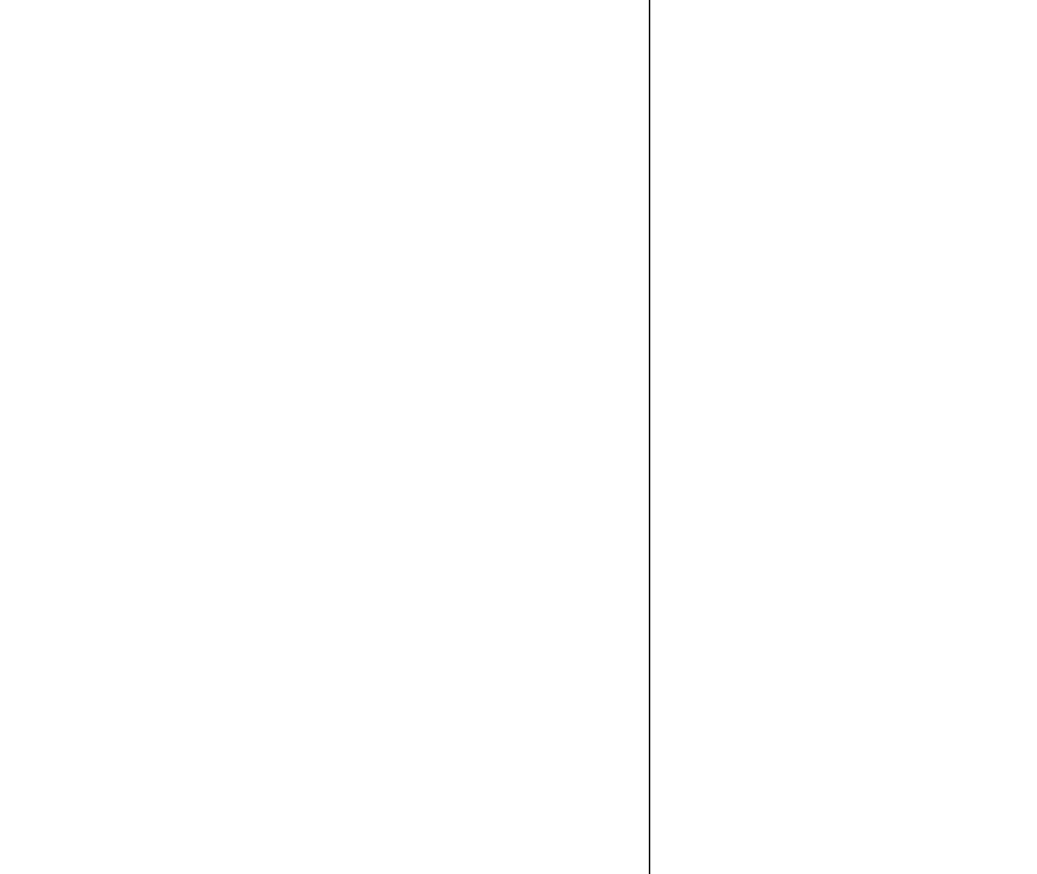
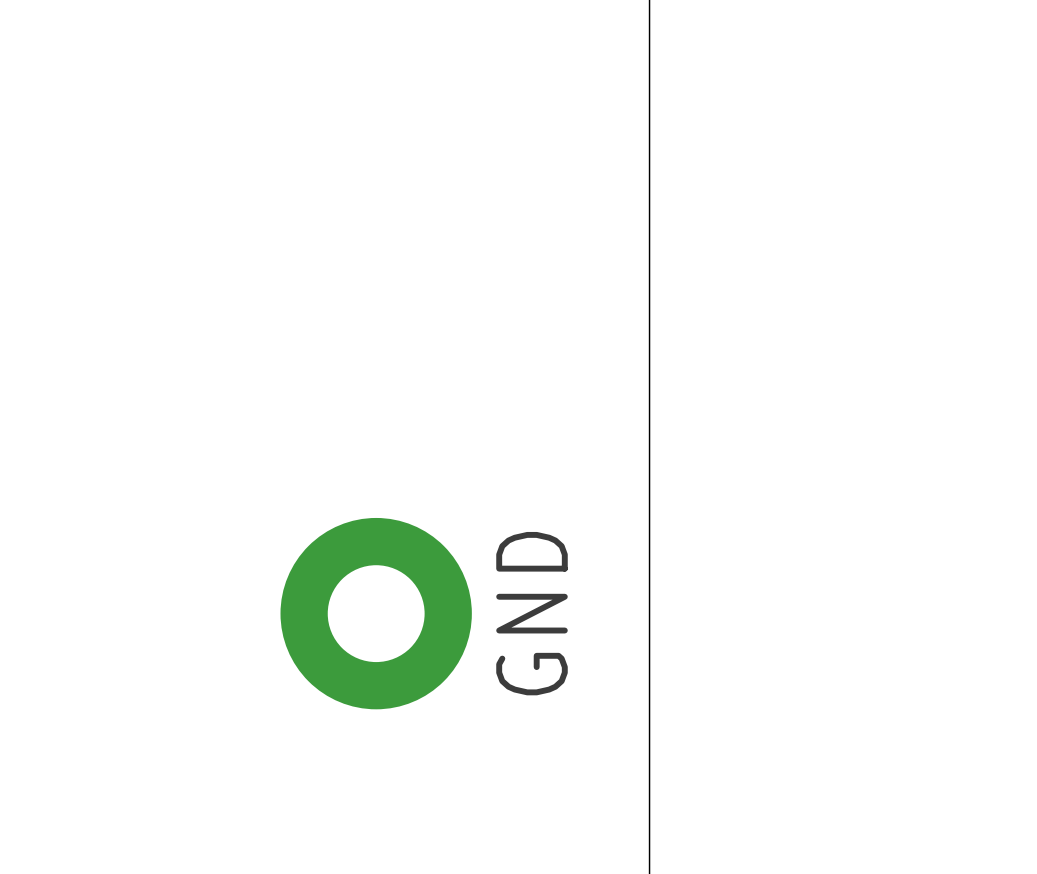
GND: none -> (376, 613)

